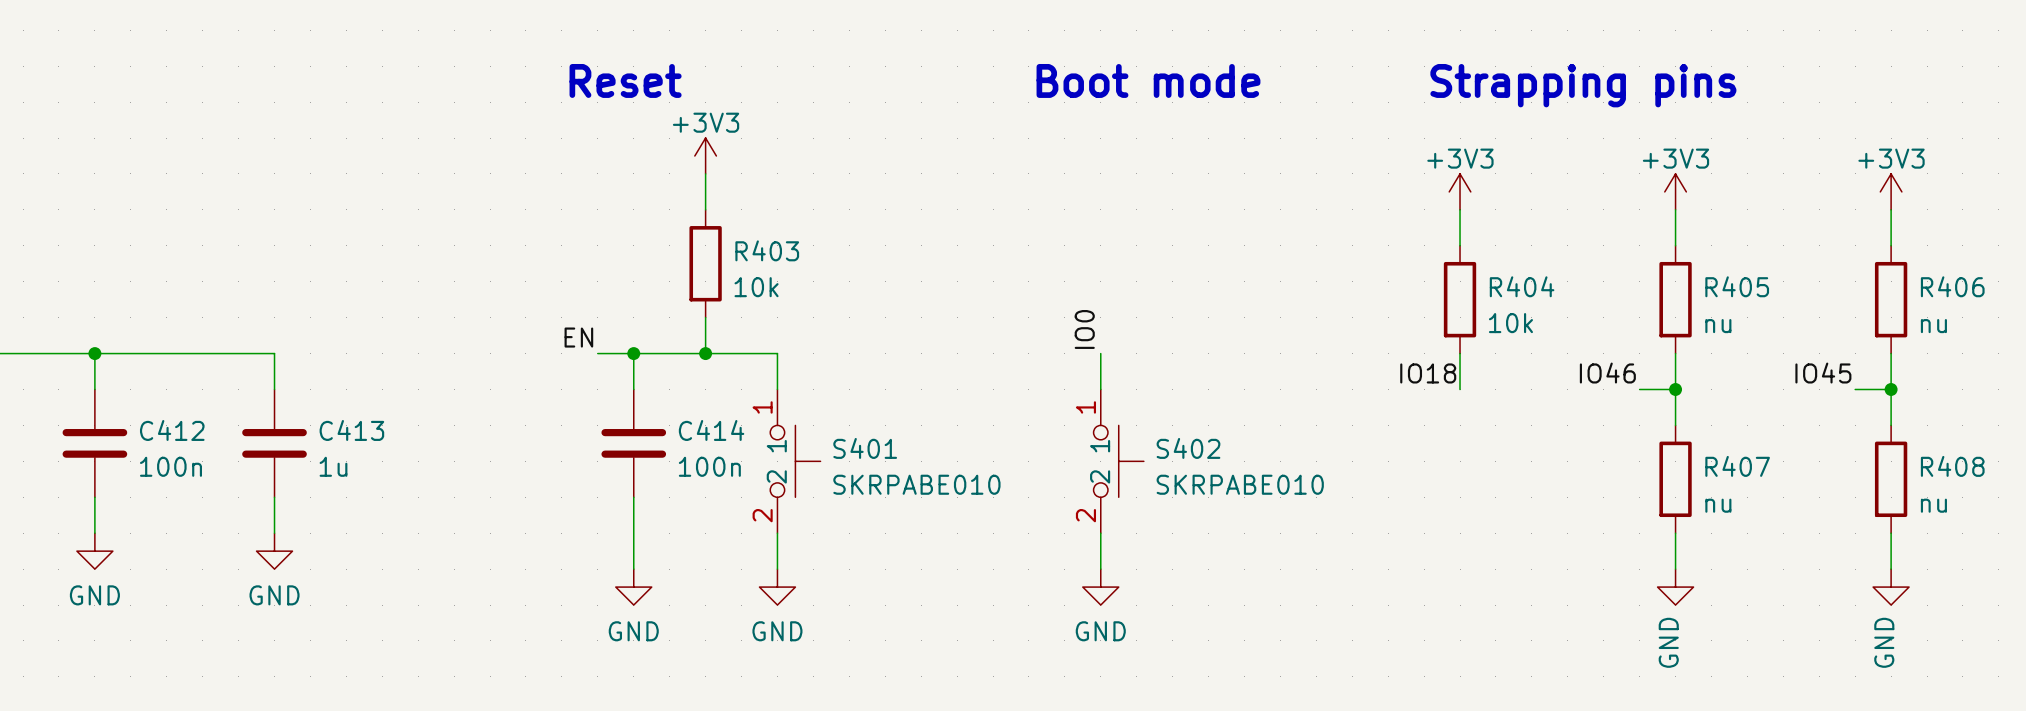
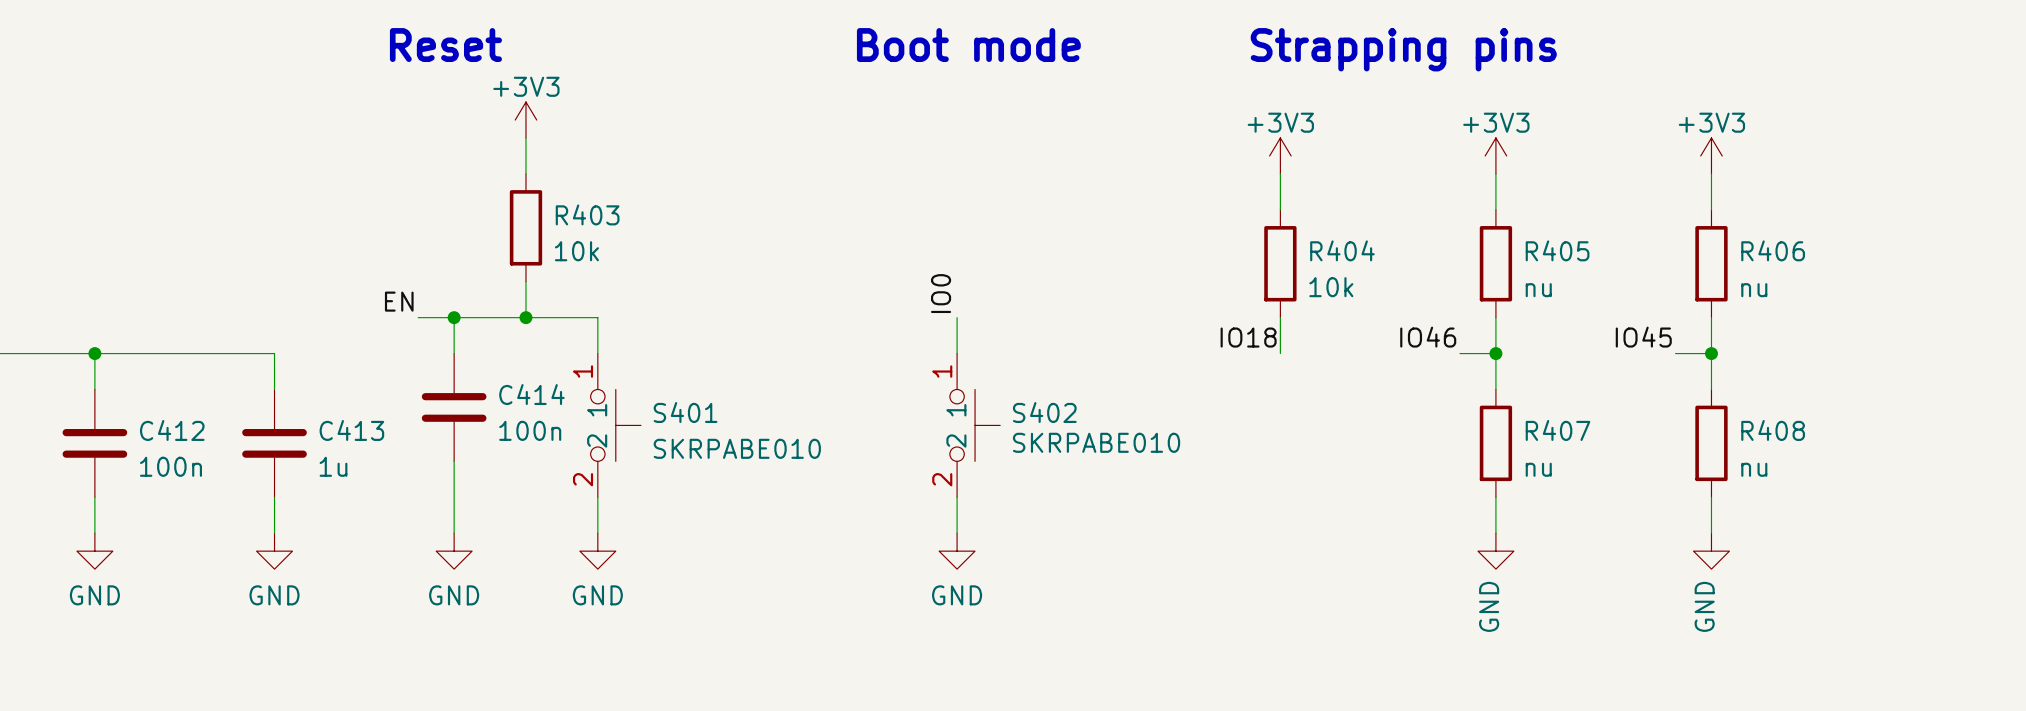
text position: Reset (625, 80) -> Reset (445, 45)
text position: Boot mode (1148, 80) -> Boot mode (968, 45)
text position: Strapping pins (1583, 85) -> Strapping pins (1403, 49)
power symbol position: +3V3 (705, 155) -> +3V3 (525, 120)
power symbol: none -> +3V3 (1280, 155)
wire: (705, 173) (705, 209) -> (525, 138) (525, 173)
power symbol position: +3V3 (1460, 191) -> +3V3 (1495, 155)
power symbol position: +3V3 (1675, 191) -> +3V3 (1711, 155)
power symbol: +3V3 (1891, 191) -> none
wire: (1460, 209) (1460, 245) -> (1280, 173) (1280, 209)
wire: (1675, 209) (1675, 245) -> (1495, 173) (1495, 209)
wire: (1891, 209) (1891, 245) -> (1711, 173) (1711, 209)
R403 position: (705, 263) -> (525, 227)
R404 position: (1460, 299) -> (1280, 263)
R405 position: (1675, 299) -> (1495, 263)
R406 position: (1891, 299) -> (1711, 263)
junction: none -> (454, 317)
junction: none -> (525, 317)
wire: (705, 317) (705, 353) -> (525, 281) (525, 317)
wire: none -> (1280, 317) (1280, 353)
wire: none -> (1495, 317) (1495, 389)
label position: IO0 (1084, 329) -> IO0 (941, 293)
label position: EN (578, 337) -> EN (399, 301)
wire: (597, 353) (777, 353) (777, 389) -> (597, 353) (597, 317) (418, 317)
wire: (633, 353) (633, 389) -> (454, 317) (454, 353)
junction: (633, 353) -> none
junction: (705, 353) -> none
wire: (1100, 353) (1100, 389) -> (957, 317) (957, 353)
wire: (1460, 353) (1460, 389) -> (1460, 353) (1495, 353)
junction: none -> (1495, 353)
wire: (1675, 353) (1675, 425) -> (1675, 353) (1711, 353)
wire: (1891, 353) (1891, 425) -> (1711, 317) (1711, 389)
label position: IO18 (1428, 373) -> IO18 (1248, 337)
label position: IO46 (1607, 373) -> IO46 (1428, 337)
label position: IO45 (1823, 373) -> IO45 (1643, 337)
wire: (1639, 389) (1675, 389) -> none
junction position: (1675, 389) -> (1711, 353)
wire: (1855, 389) (1891, 389) -> none
junction: (1891, 389) -> none
C414 position: (633, 443) -> (454, 407)
S401 position: (795, 461) -> (615, 425)
S402 position: (1118, 461) -> (975, 425)
R407 position: (1675, 479) -> (1495, 443)
R408 position: (1891, 479) -> (1711, 443)
S402 value position: SKRPABE010 (1240, 484) -> SKRPABE010 (1096, 442)
wire: (633, 497) (633, 569) -> (454, 461) (454, 533)
wire: (777, 533) (777, 569) -> (597, 497) (597, 533)
wire: (1100, 533) (1100, 569) -> (957, 497) (957, 533)
wire: (1675, 533) (1675, 569) -> (1495, 497) (1495, 533)
wire: (1891, 533) (1891, 569) -> (1711, 497) (1711, 533)
power symbol: none -> GND (454, 551)
power symbol: none -> GND (957, 551)
power symbol: none -> GND (1495, 551)
power symbol position: GND (633, 587) -> GND (597, 551)
power symbol: GND (777, 587) -> none
power symbol: GND (1100, 587) -> none
power symbol position: GND (1675, 587) -> GND (1711, 551)
power symbol: GND (1891, 587) -> none

